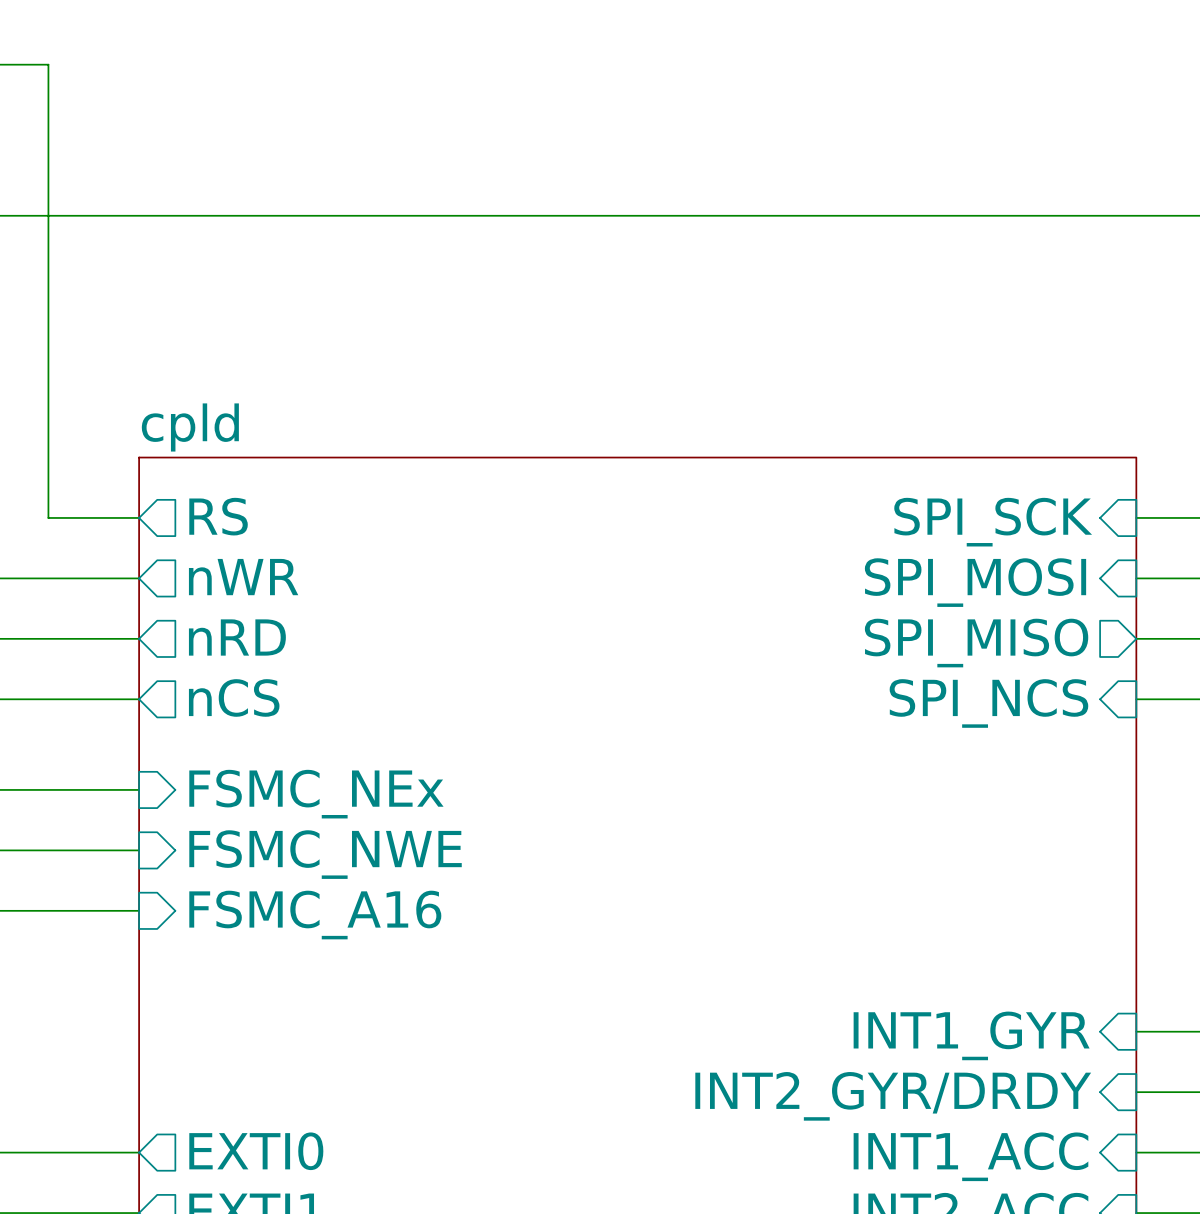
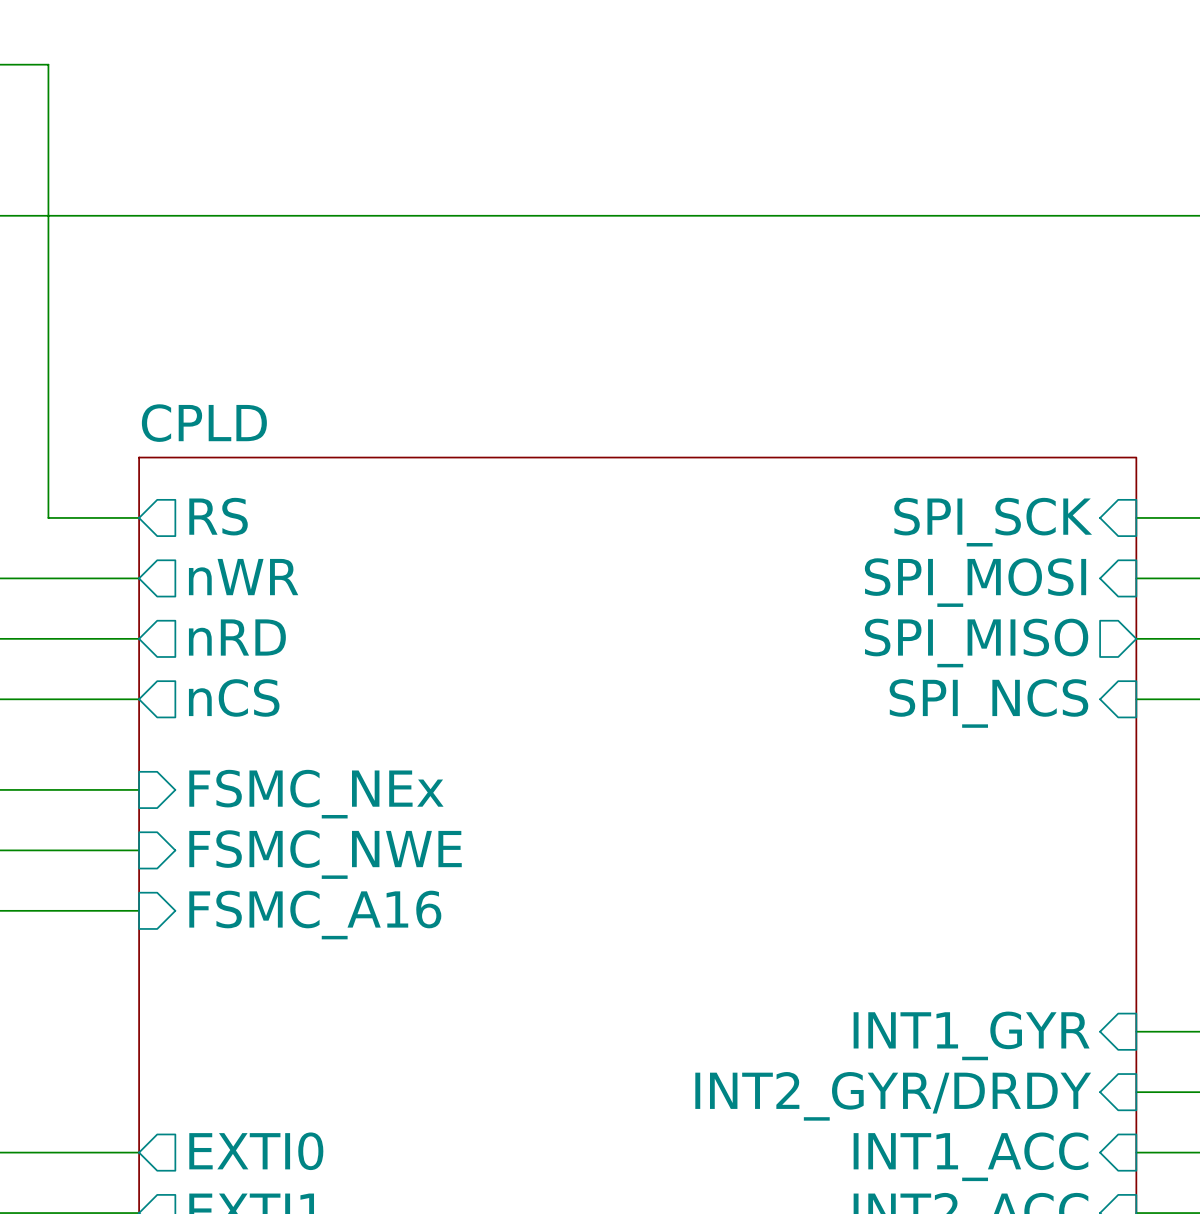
sheet cpld name: cpld (190, 427) -> CPLD (204, 423)

